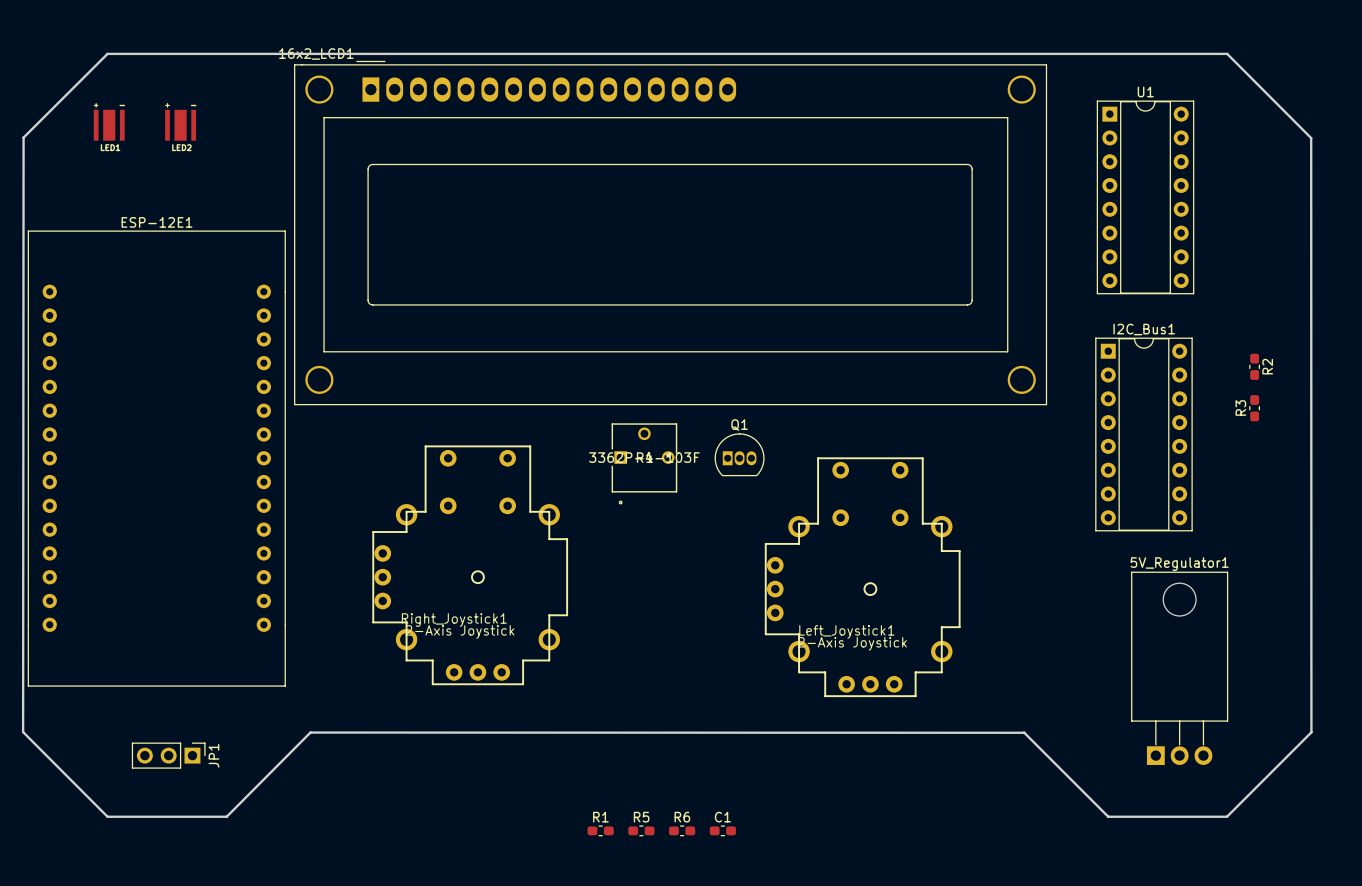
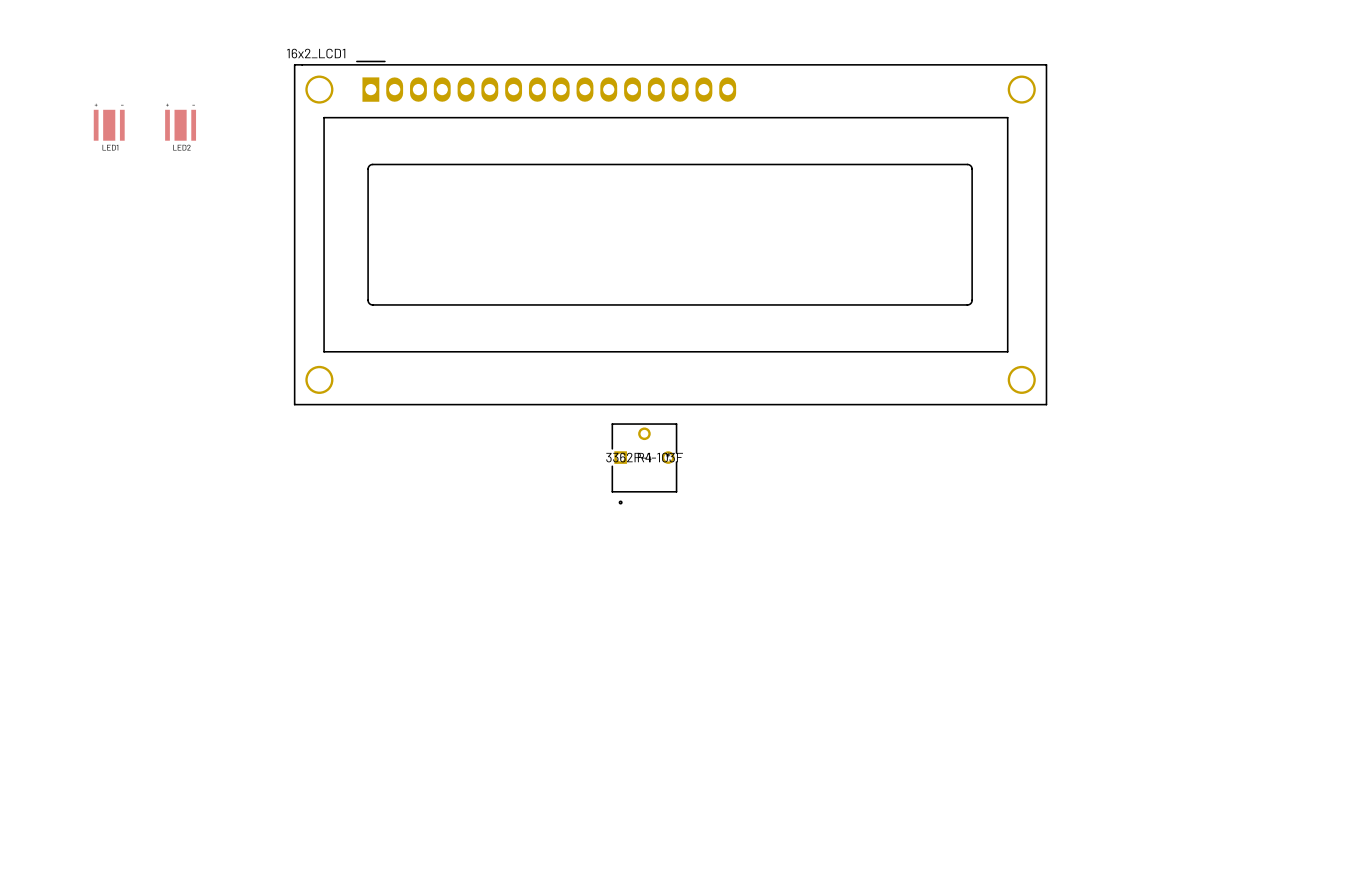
board edge: (107, 53) (23, 137) (23, 732) (107, 816) (226, 816) (310, 732) (1024, 732) (1108, 816) (1226, 816) (1311, 732) (1311, 138) (1227, 53) (107, 53) -> none
U1: (1145, 197) -> none
R2: (1254, 366) -> none
R3: (1254, 408) -> none
I2C_Bus1: (1143, 434) -> none
Q1: (739, 454) -> none
ESP-12E1: (156, 458) -> none
Right_Joystick1: 2-Axis Joystick (470, 565) -> none
Left_Joystick1: 2-Axis Joystick (862, 577) -> none
5V_Regulator1: (1179, 668) -> none
JP1: (168, 755) -> none
R1: (600, 830) -> none
R5: (641, 830) -> none
R6: (682, 830) -> none
C1: (722, 830) -> none

